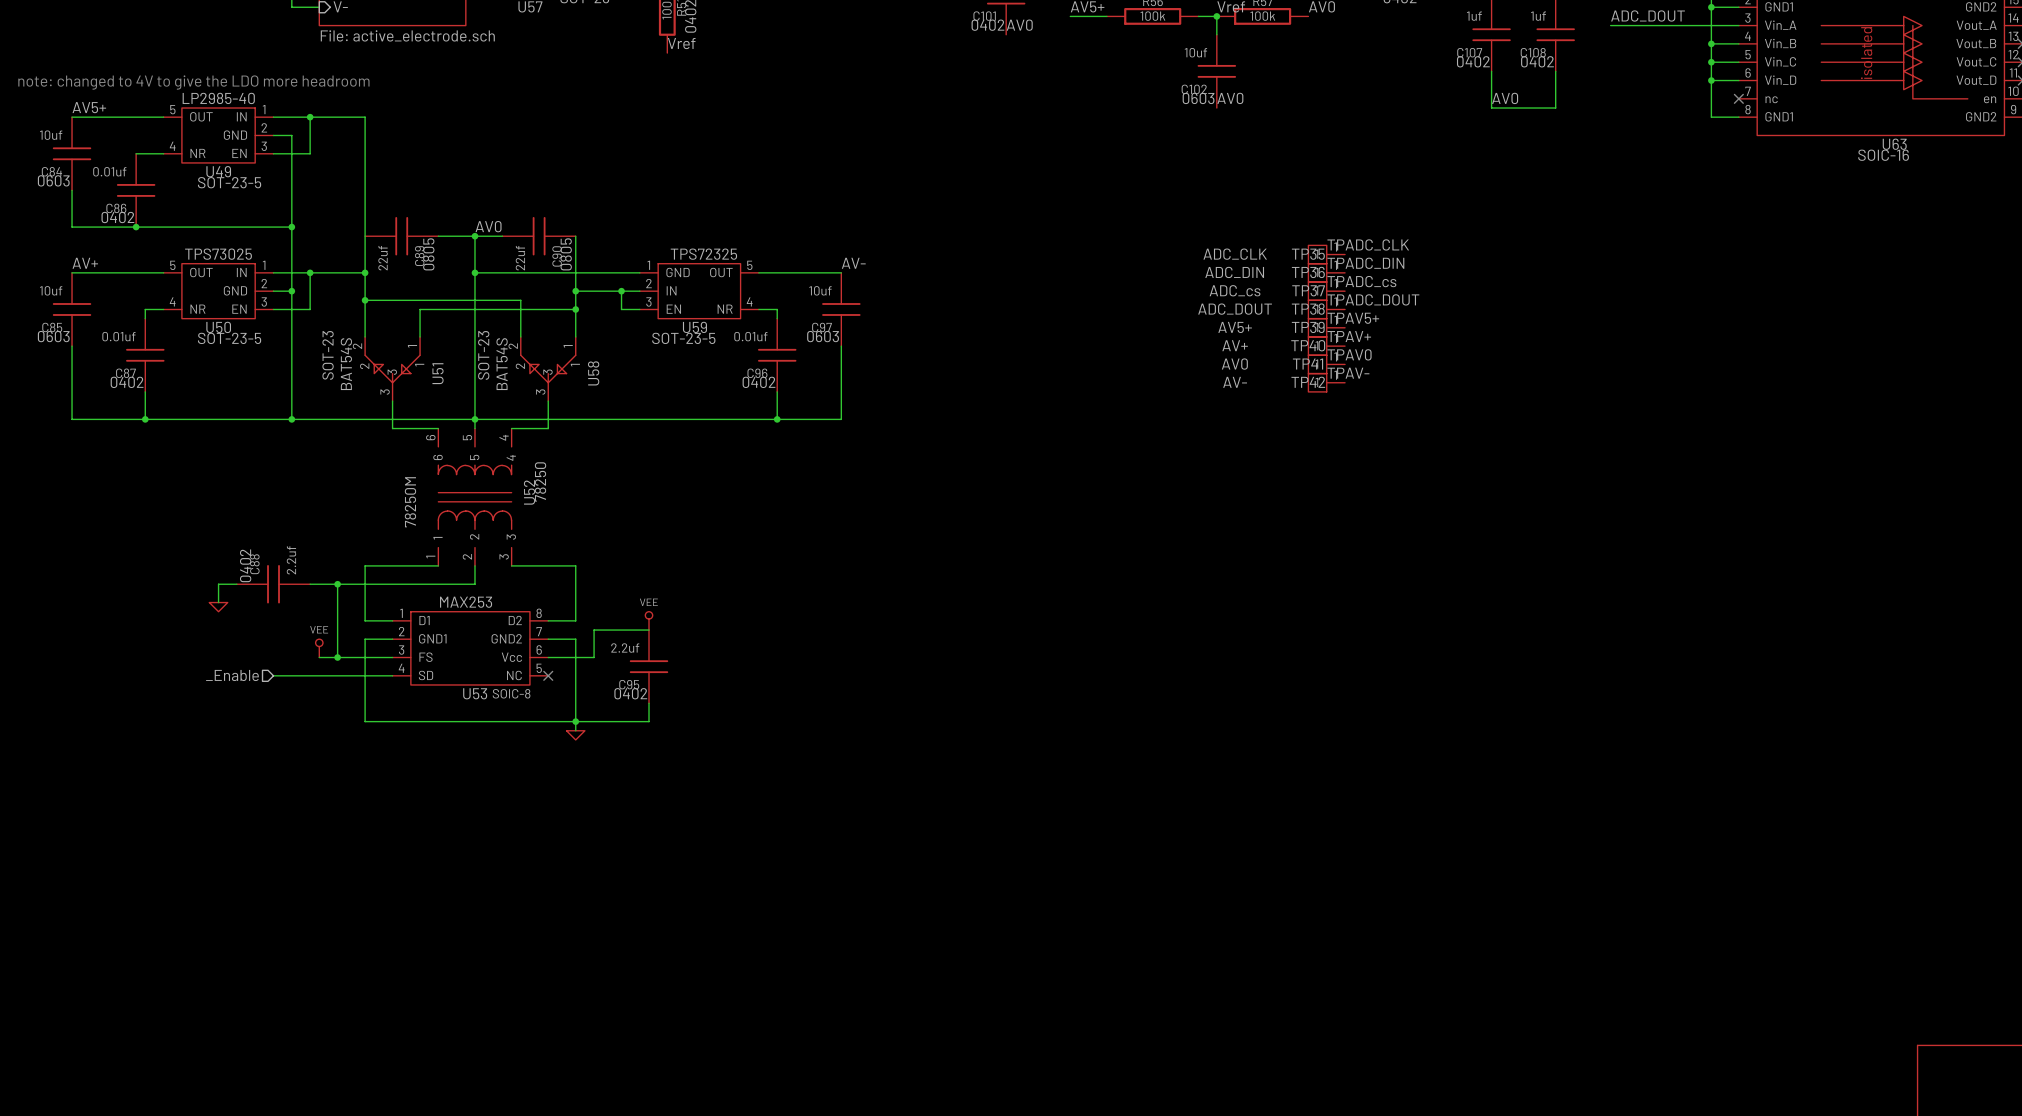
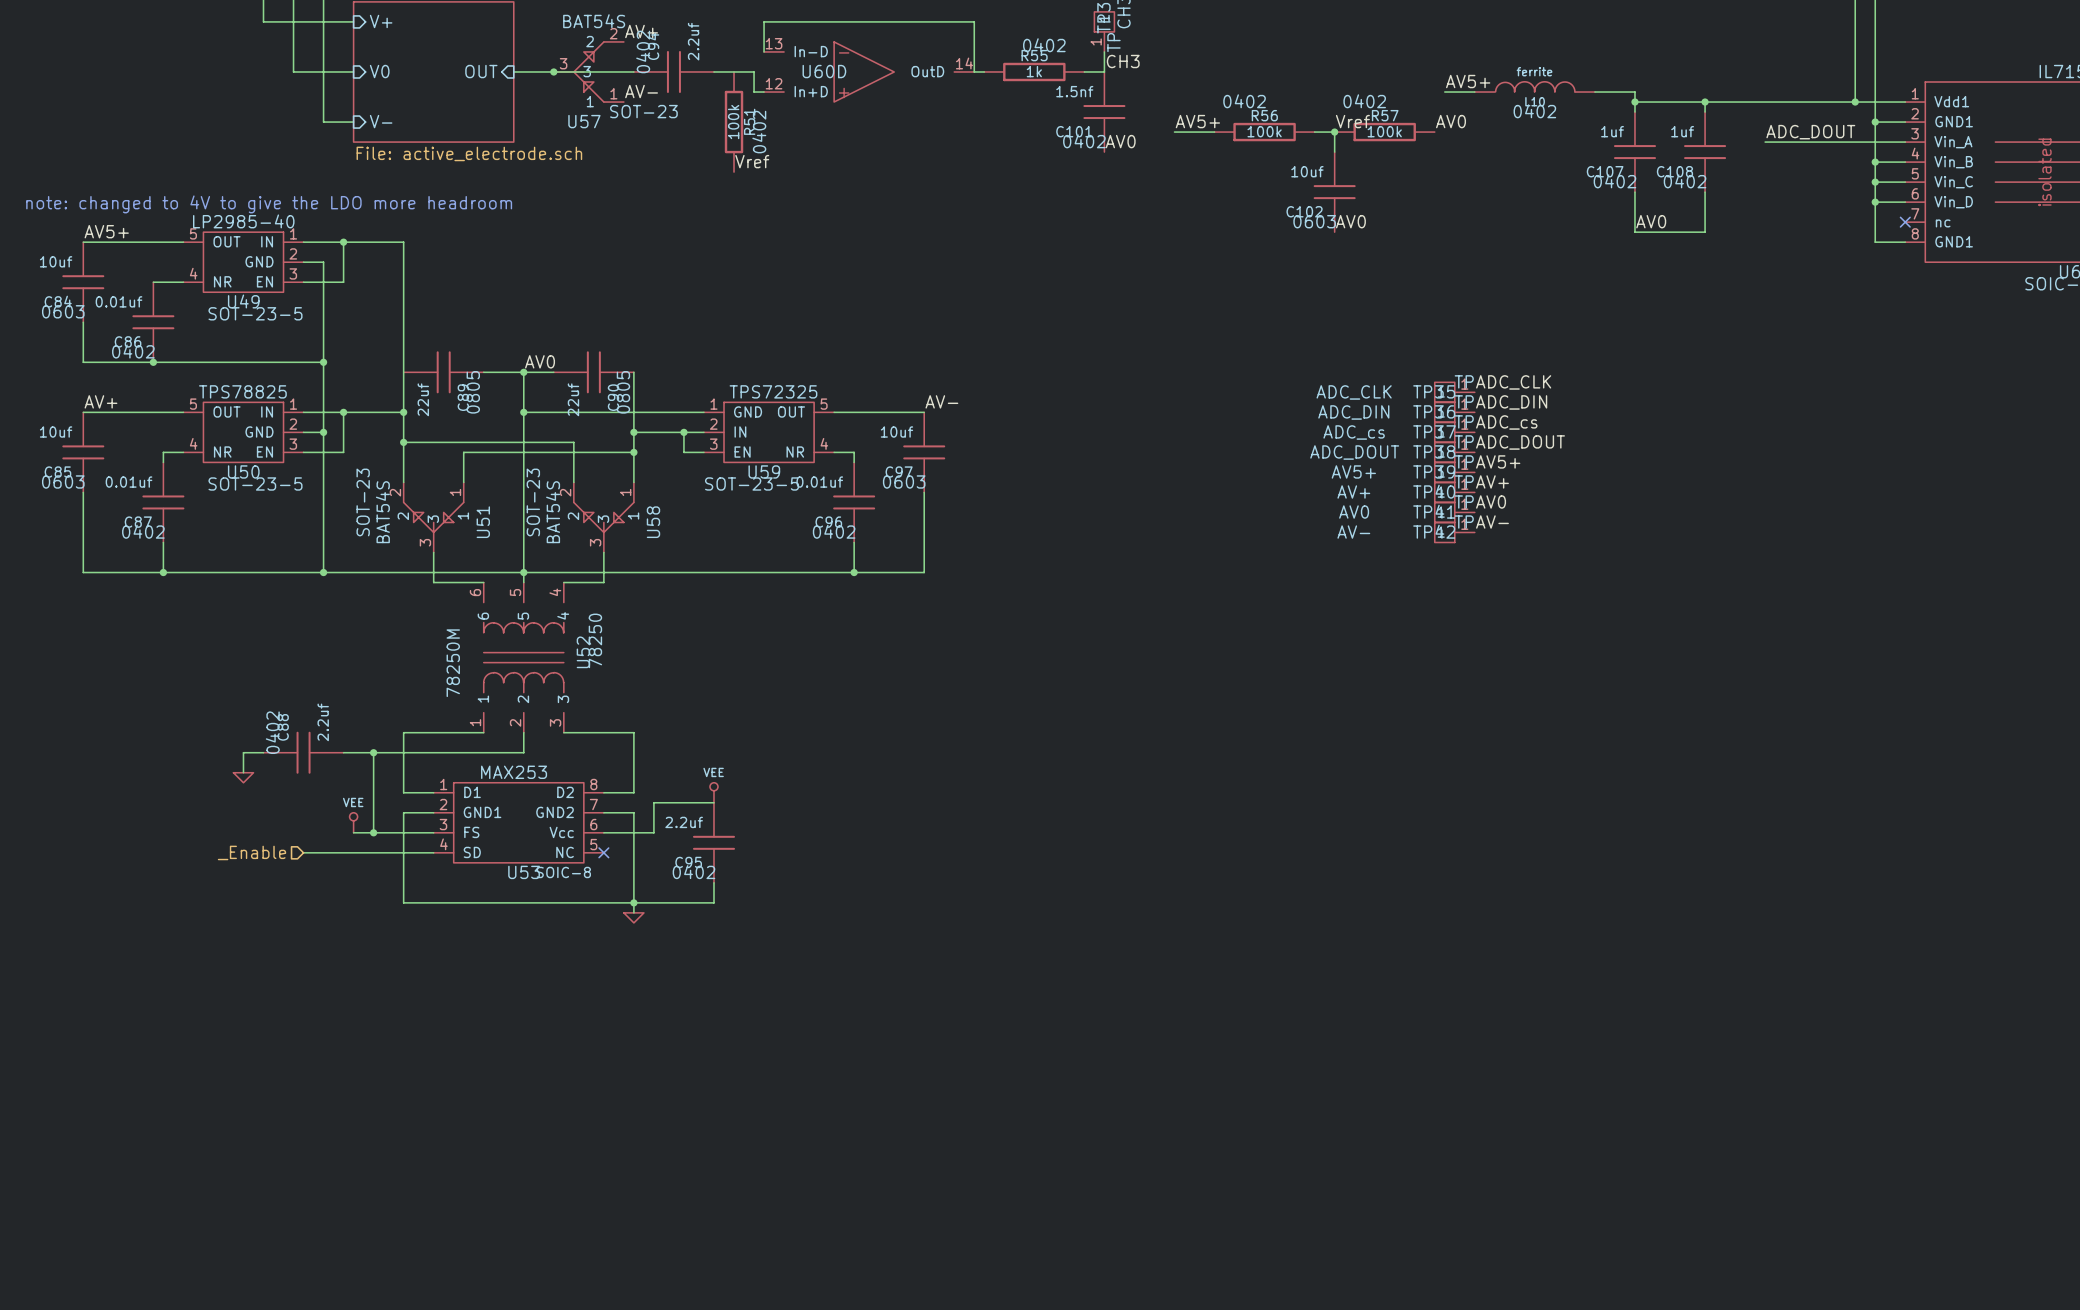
U50 value: TPS73025 (218, 254) -> TPS78825 (242, 391)

